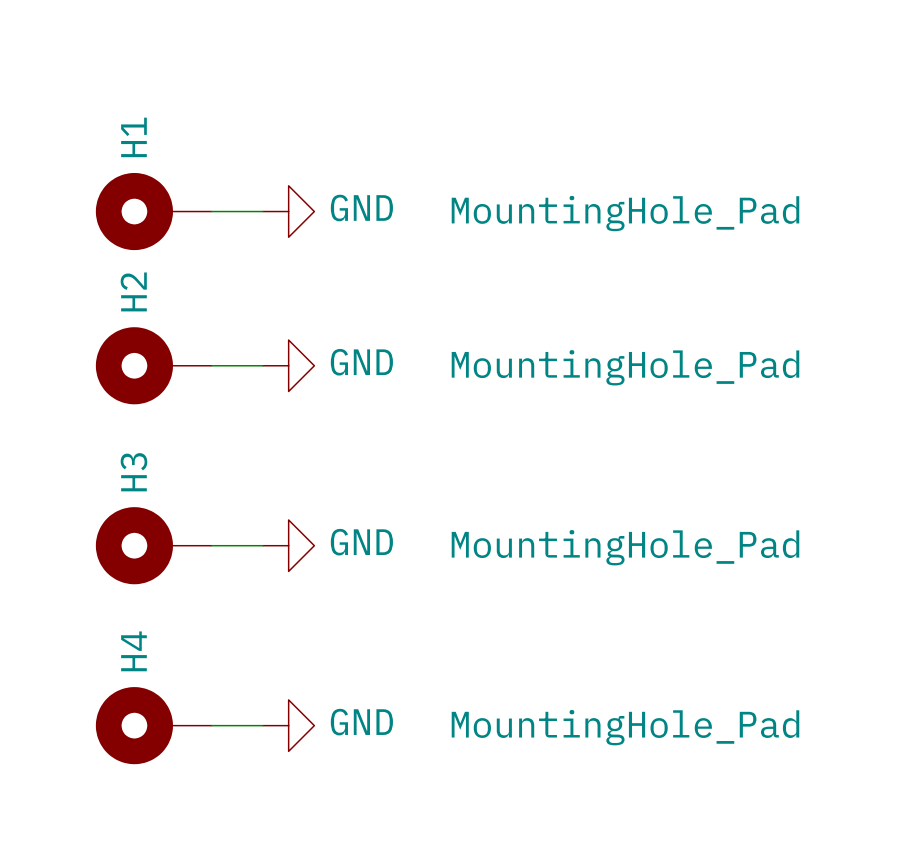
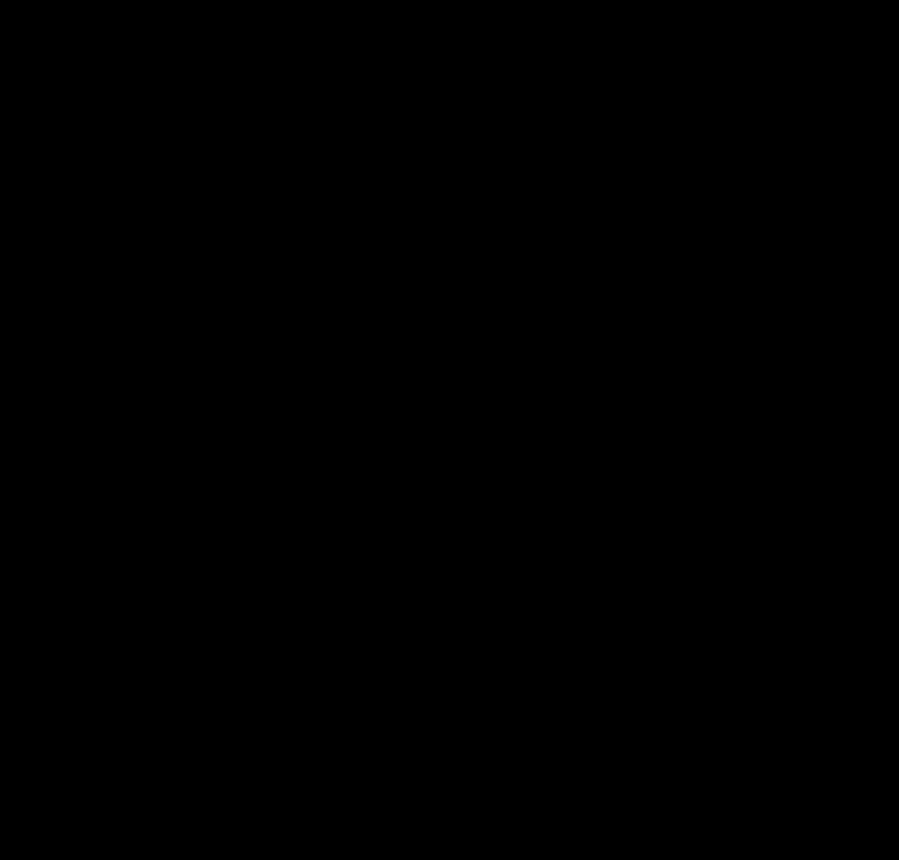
H1: MountingHole_Pad (153, 211) -> none
wire: (211, 211) (262, 211) -> none
power symbol: GND (288, 211) -> none
H2: MountingHole_Pad (153, 365) -> none
wire: (211, 365) (262, 365) -> none
power symbol: GND (288, 365) -> none
H3: MountingHole_Pad (153, 545) -> none
wire: (211, 545) (262, 545) -> none
power symbol: GND (288, 545) -> none
H4: MountingHole_Pad (153, 725) -> none
wire: (211, 725) (262, 725) -> none
power symbol: GND (288, 725) -> none

